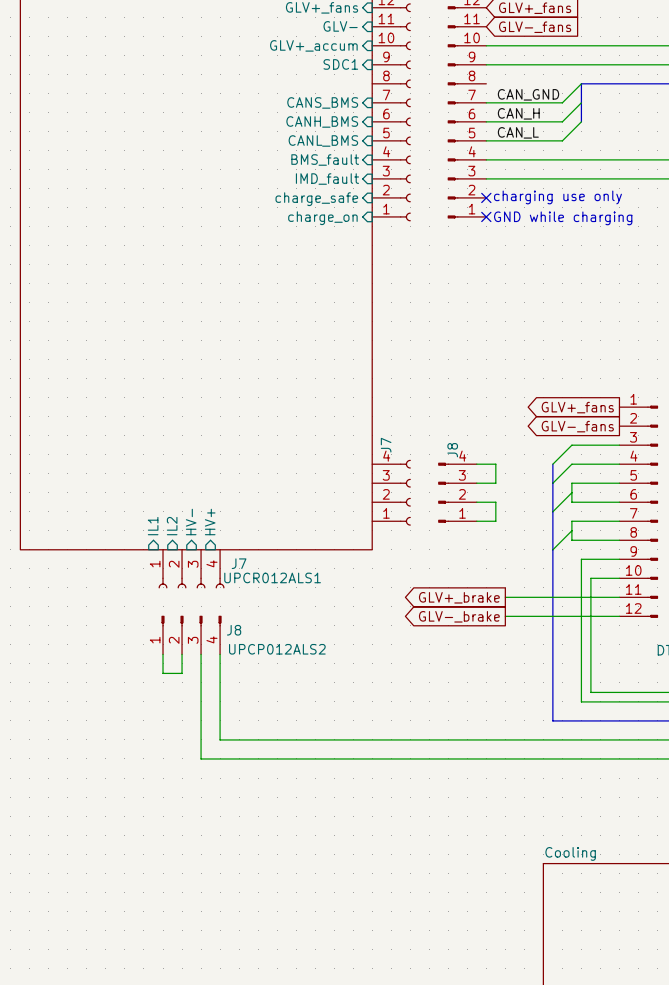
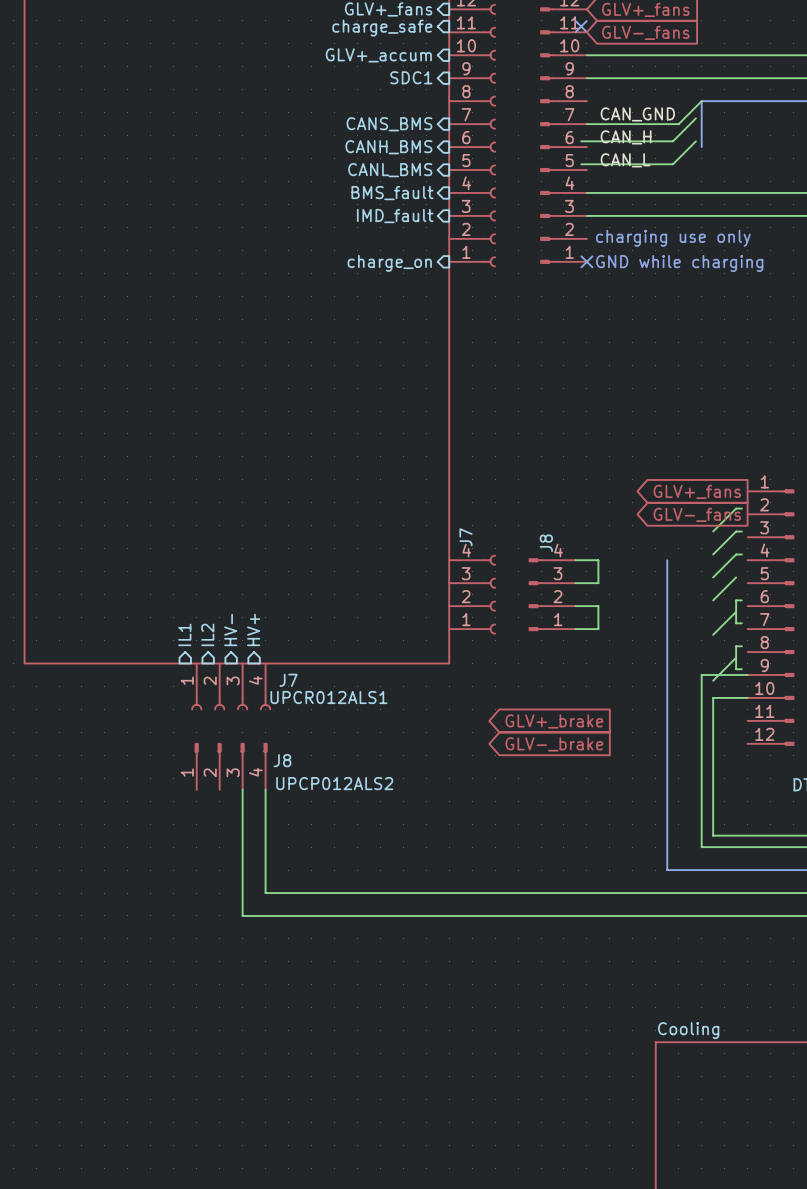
no-connect mark: none -> (581, 26)
sheet pin: GLV- (340, 26) -> none
wire: none -> (695, 118) (672, 141)
wire: (581, 102) (562, 121) (486, 121) -> (695, 141) (672, 164) (581, 164)
wire: none -> (581, 141) (672, 141)
wire: (581, 121) (562, 140) (486, 140) -> none
no-connect mark: (486, 197) -> none
sheet pin position: charge_safe (316, 199) -> charge_safe (382, 28)
wire: none -> (741, 508) (736, 508) (713, 531)
wire: none -> (741, 531) (736, 531) (713, 554)
wire: (619, 445) (571, 445) (552, 464) -> none
wire: none -> (741, 554) (736, 554) (713, 577)
wire: (619, 464) (571, 464) (552, 483) -> none
wire: none -> (736, 577) (713, 600)
wire: (619, 483) (571, 483) (571, 502) (619, 502) -> none
wire: (571, 492) (552, 511) -> (736, 611) (713, 634)
wire: none -> (741, 600) (736, 600) (736, 623) (741, 623)
wire: (619, 521) (571, 521) (571, 540) (619, 540) -> none
wire: (571, 530) (552, 549) -> (736, 657) (713, 680)
wire: none -> (741, 646) (736, 646) (736, 669) (741, 669)
wire: (505, 597) (619, 597) -> none
wire: (505, 616) (619, 616) -> none
wire: (163, 654) (163, 673) (182, 673) (182, 654) -> none

